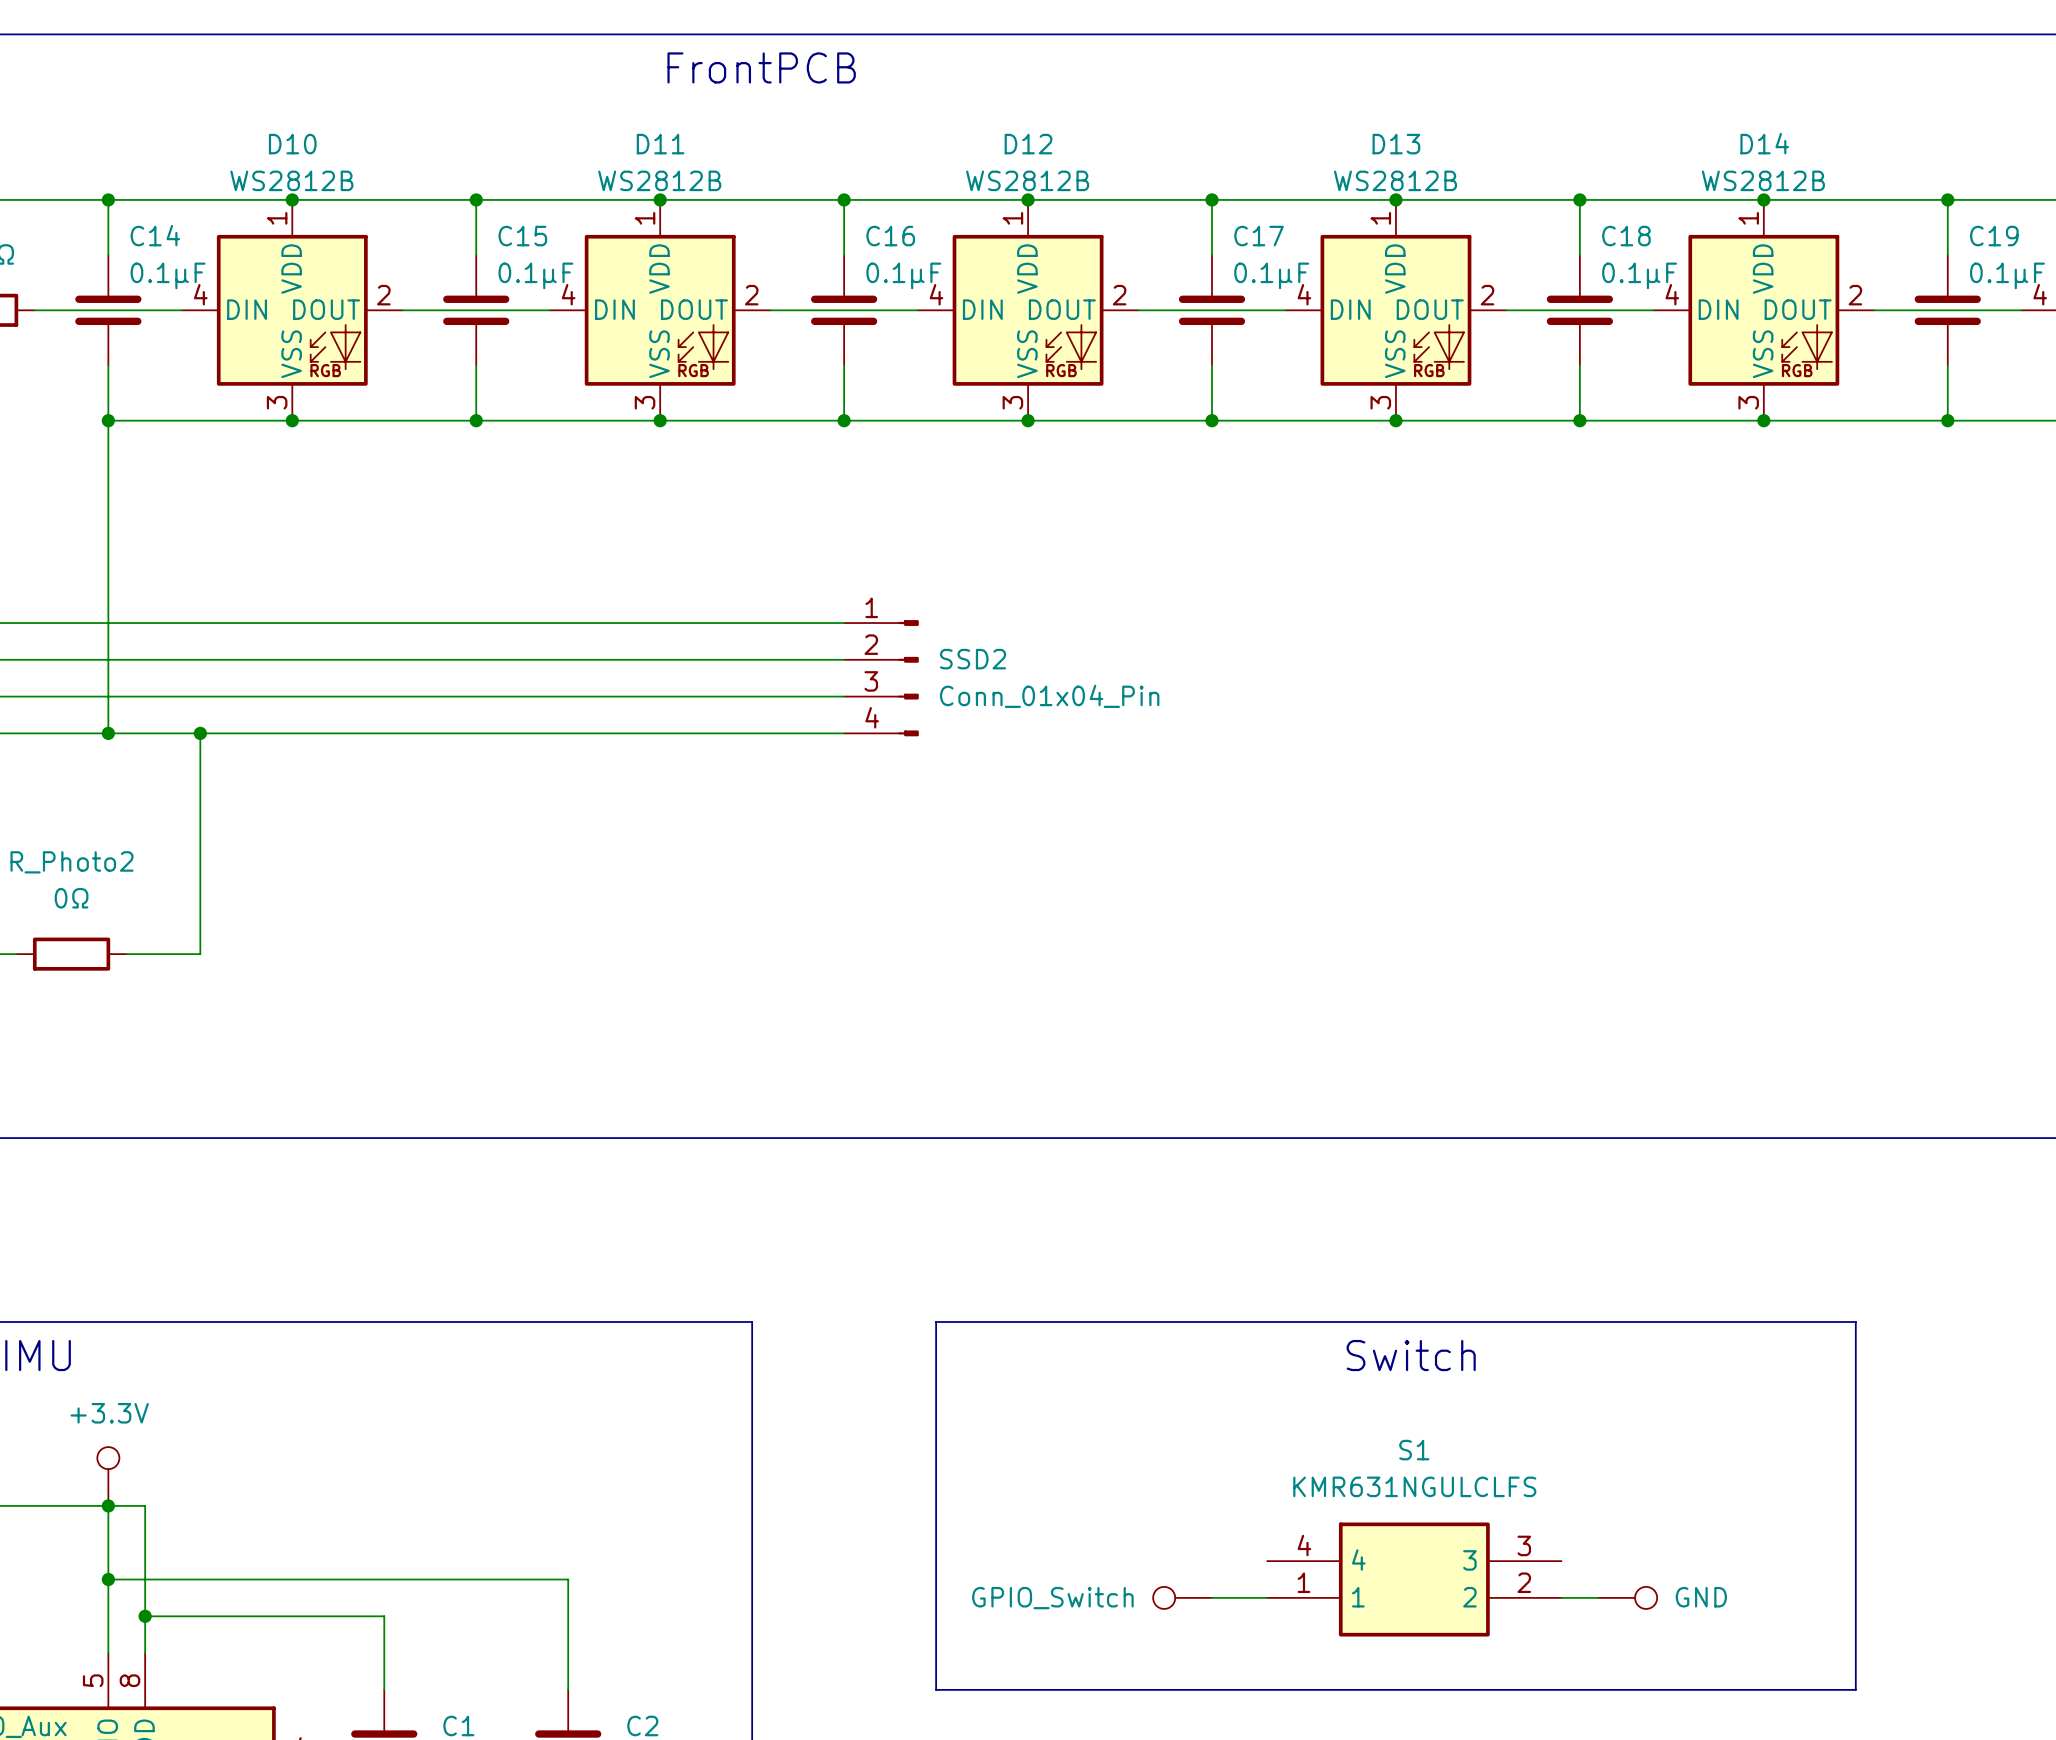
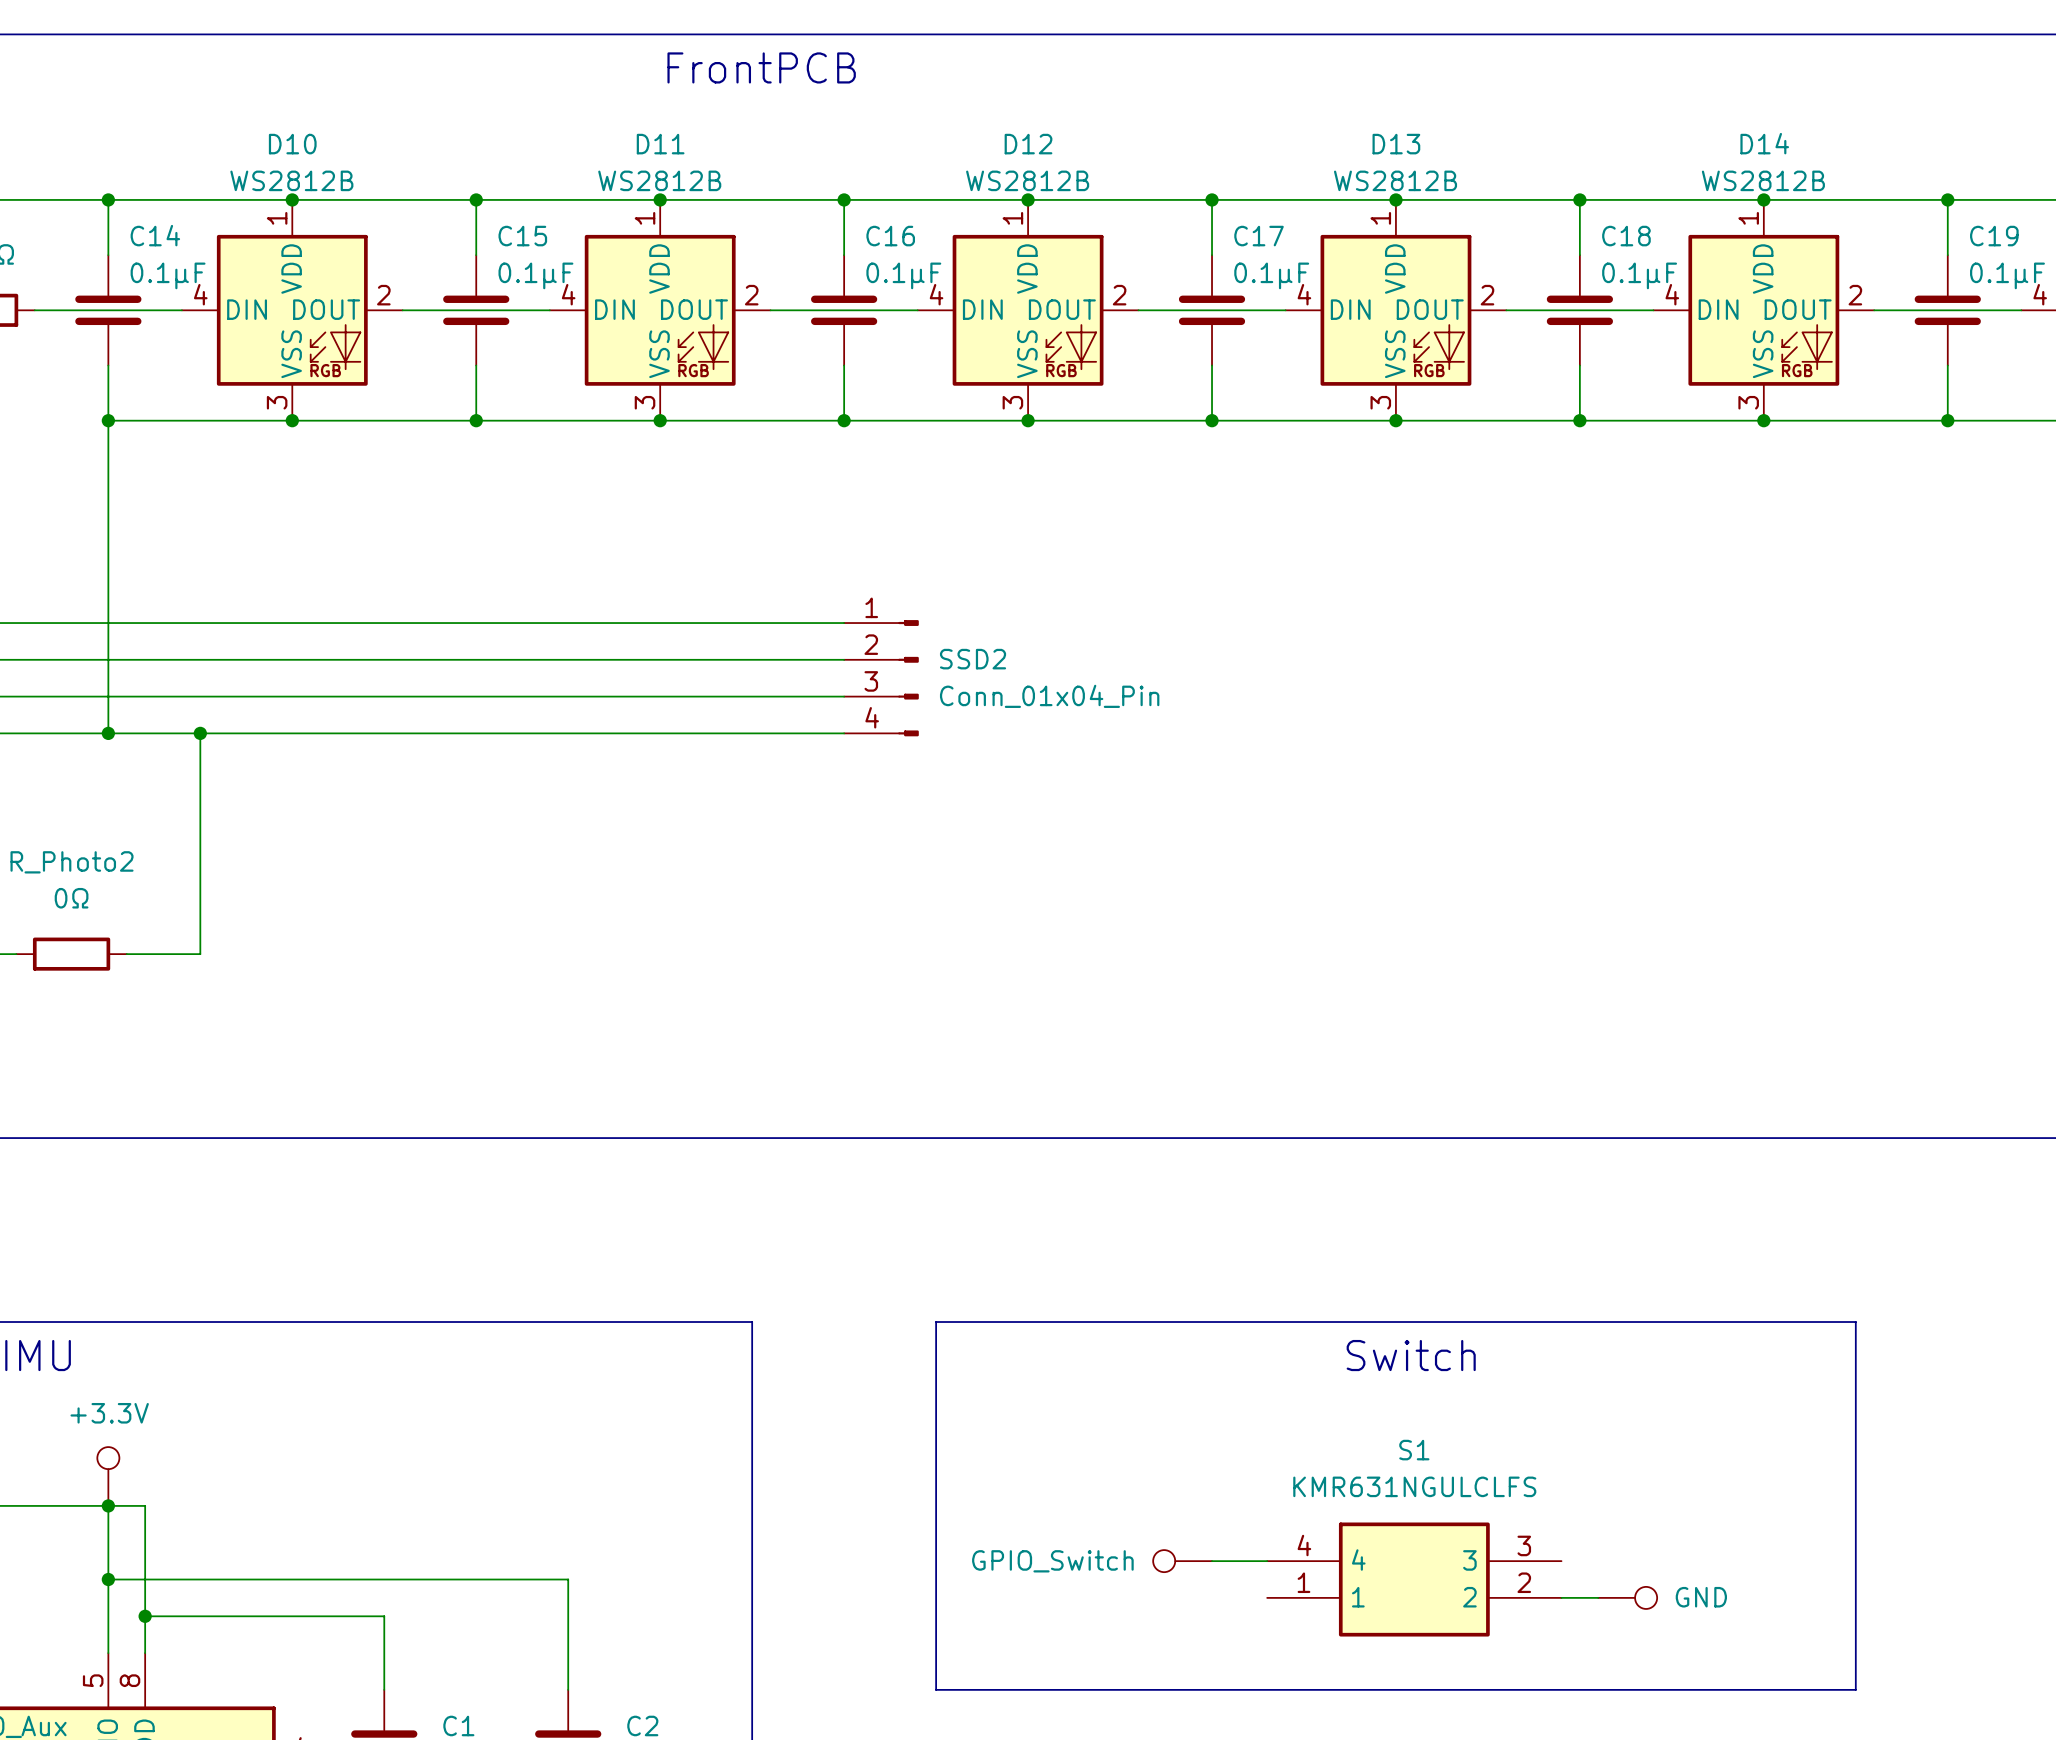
part position: (1182, 1597) -> (1182, 1561)
wire: (1212, 1597) (1267, 1597) -> (1212, 1561) (1267, 1561)

